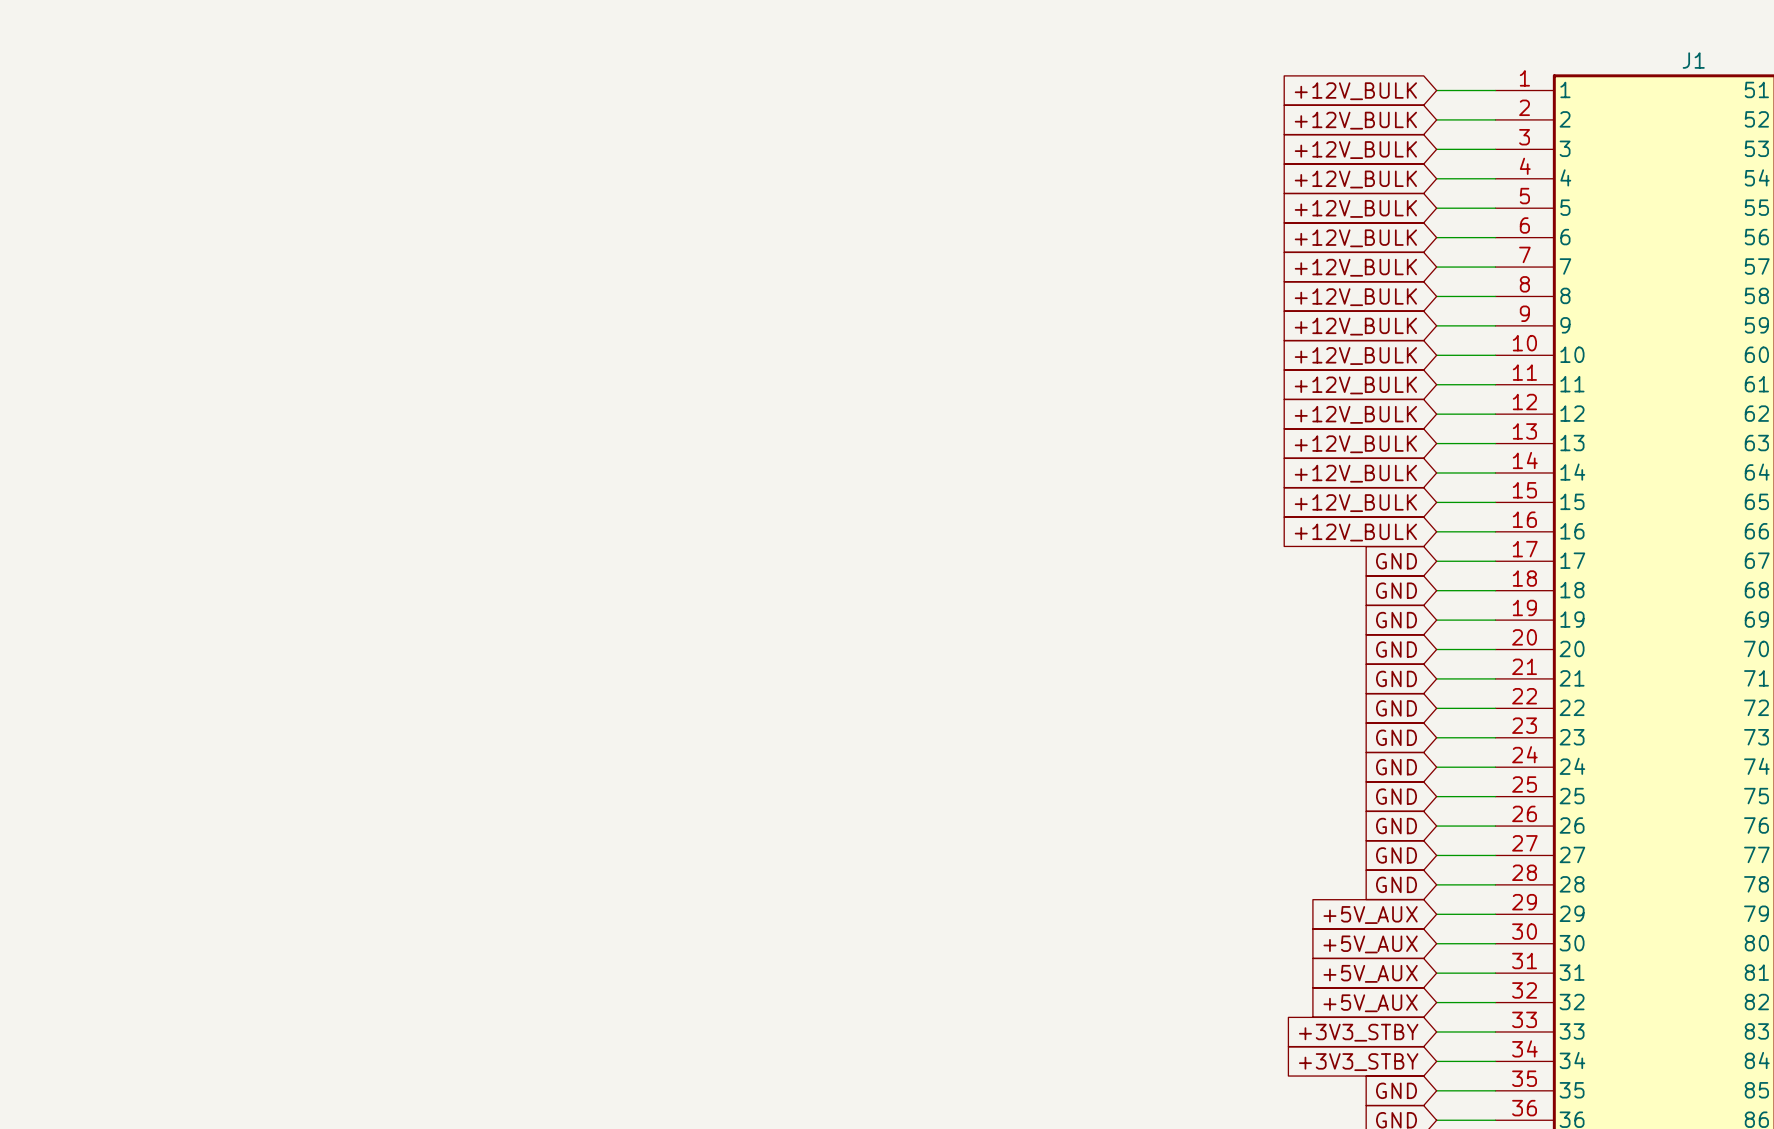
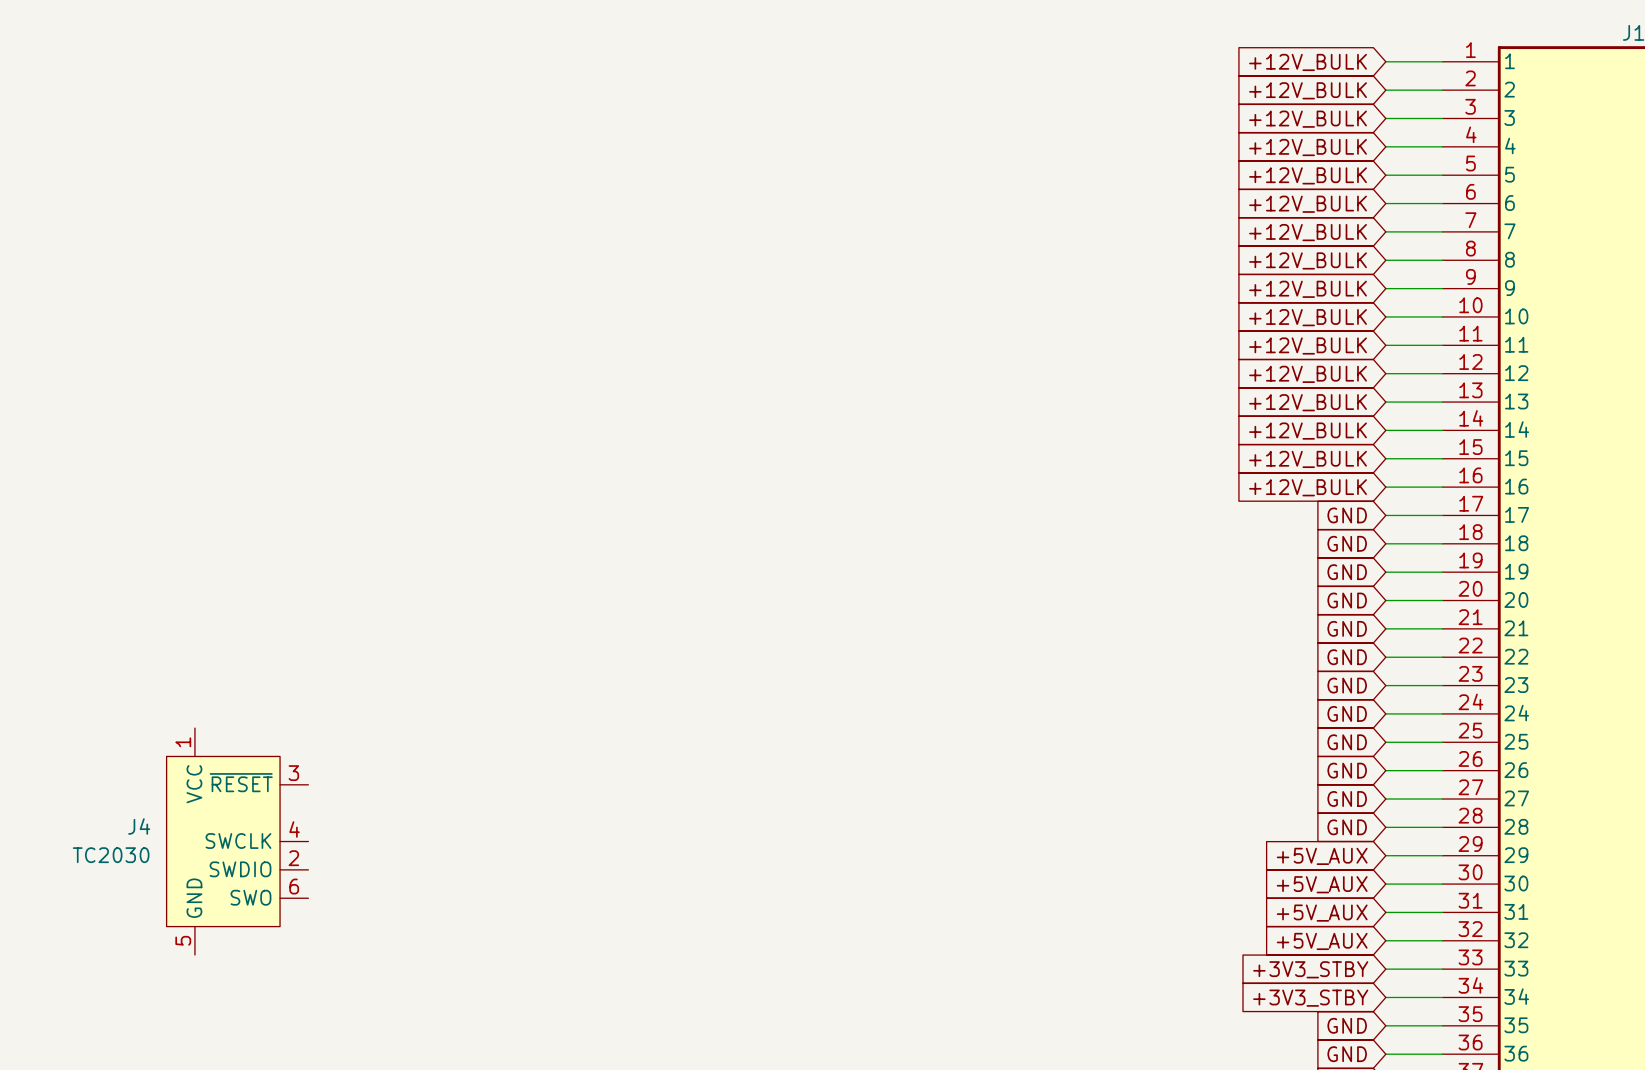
J4: none -> TC2030 (237, 841)

